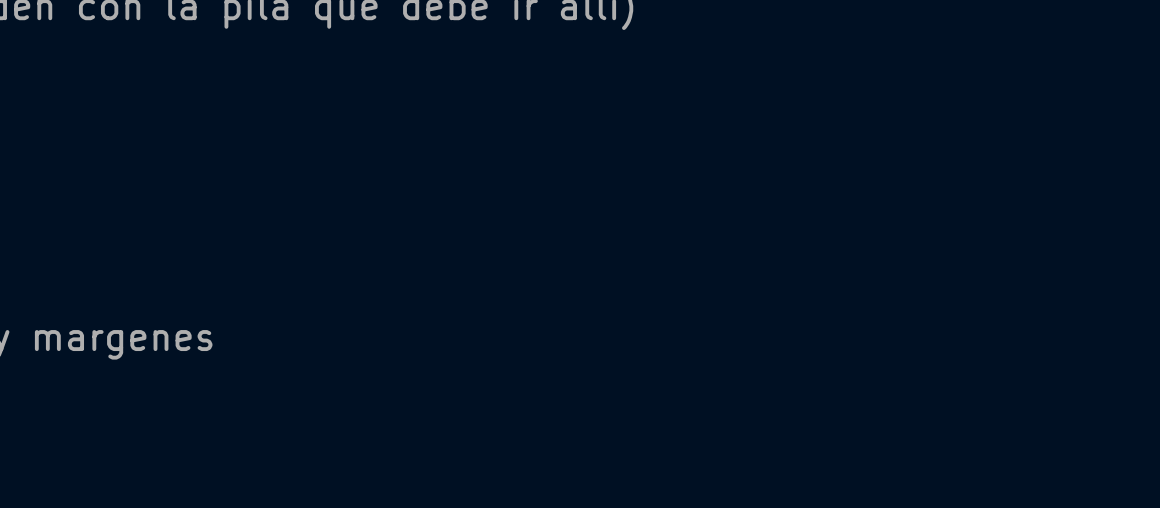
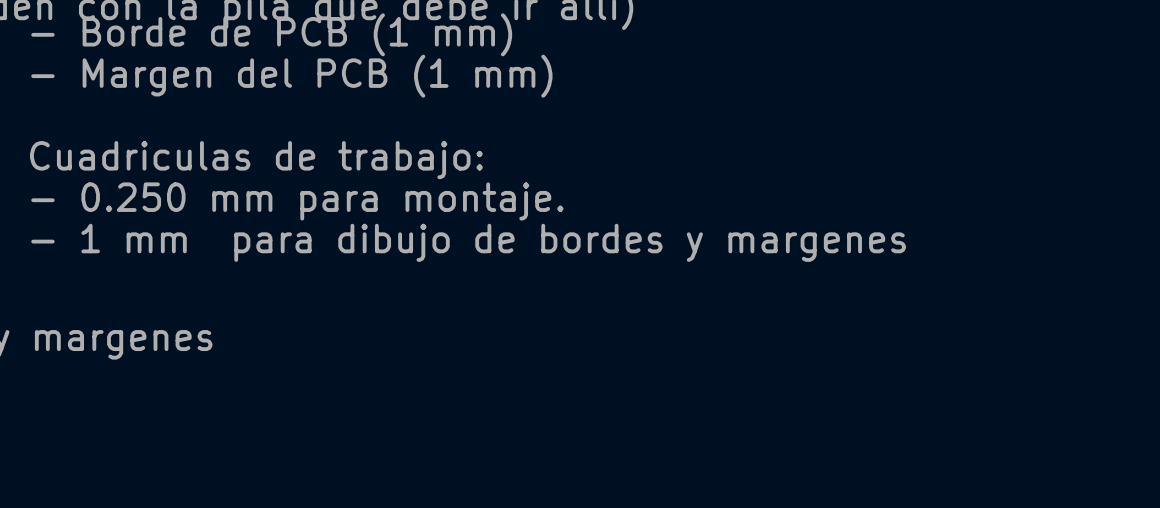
text: none -> - Borde de PCB (1 mm) (271, 34)
text: none -> - Margen del PCB (1 mm) (291, 76)
text: none -> Cuadriculas de trabajo: (256, 160)
text: none -> - 0.250 mm para montaje. (297, 201)
text: none -> - 1 mm para dibujo de bordes y margenes (468, 242)

